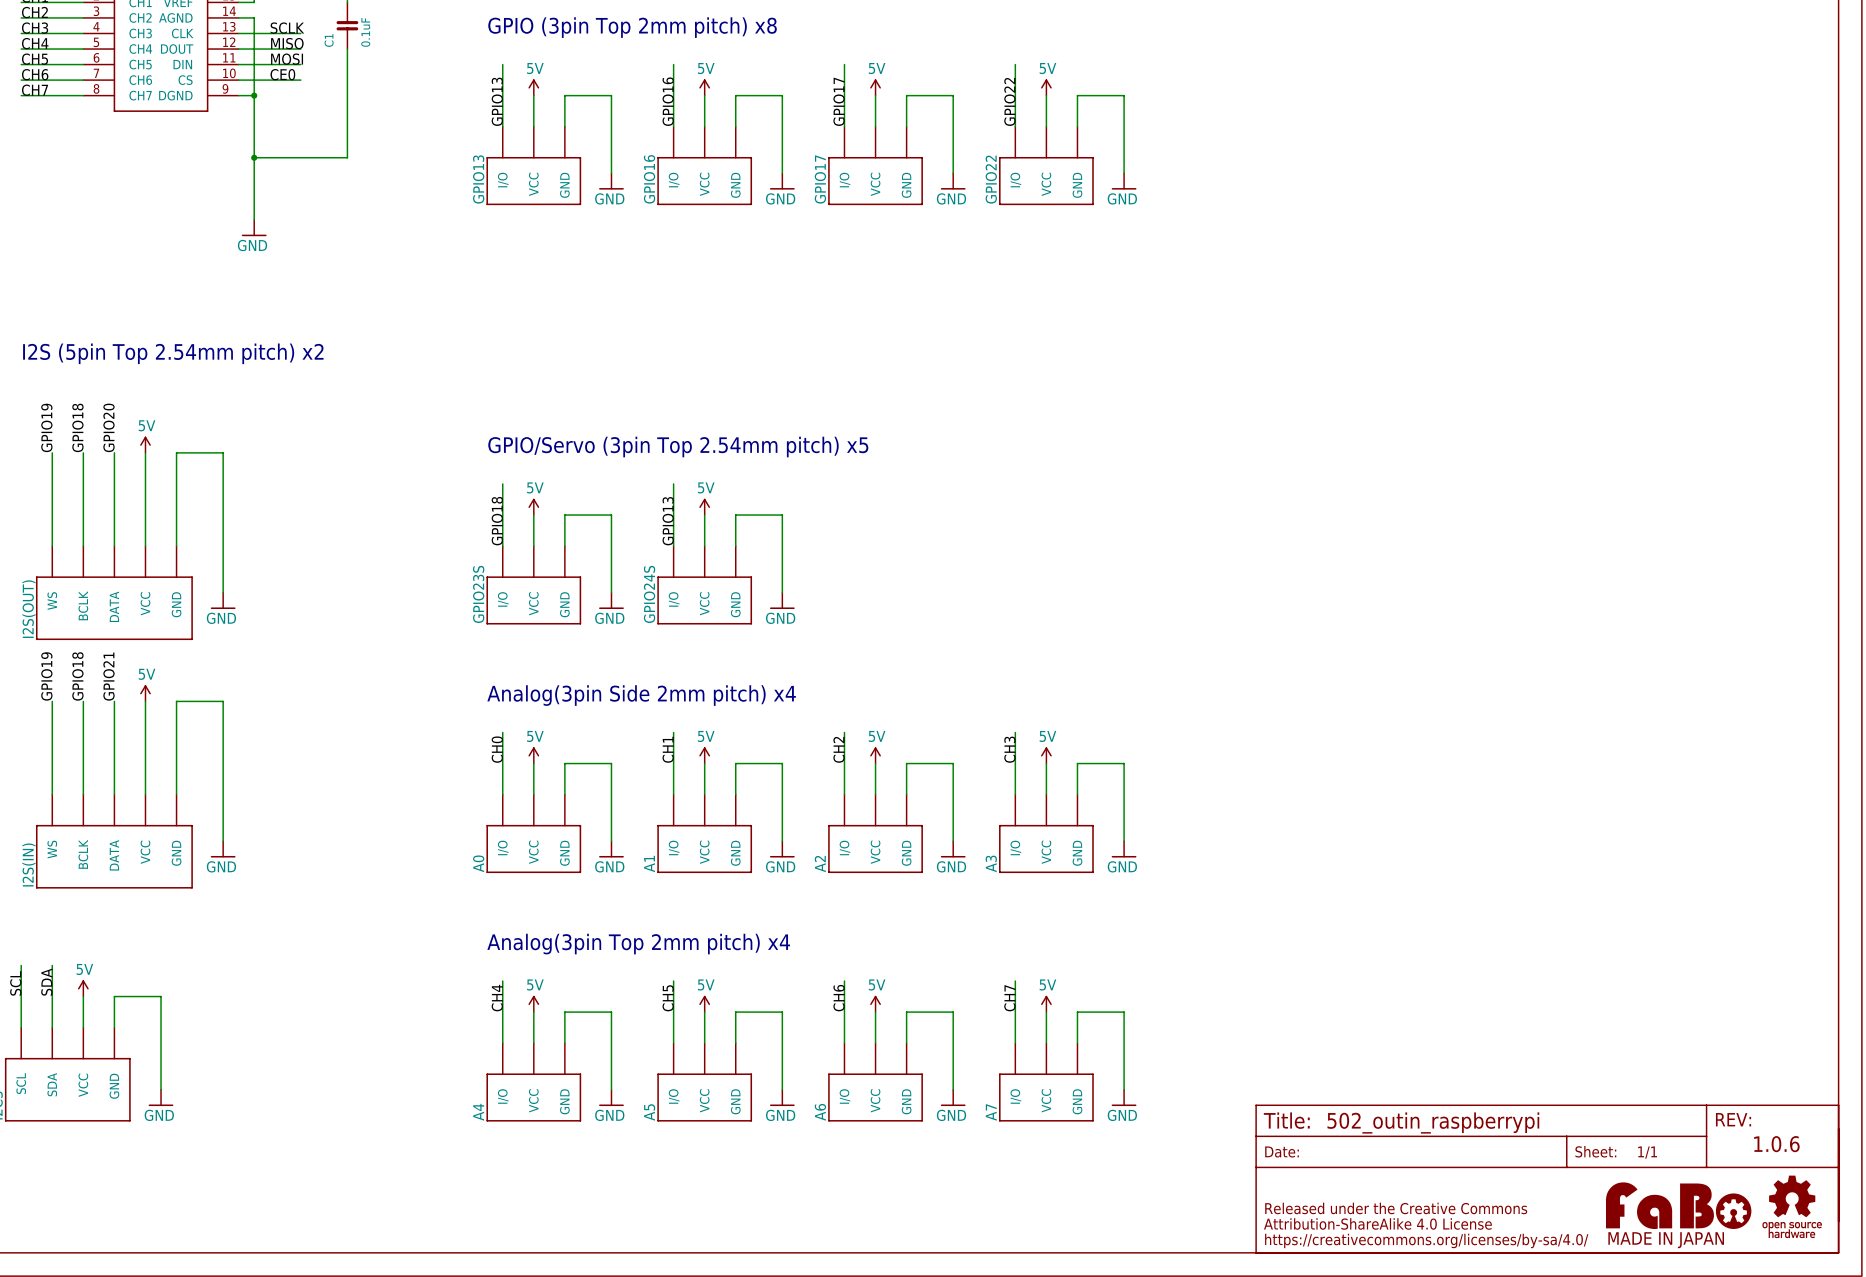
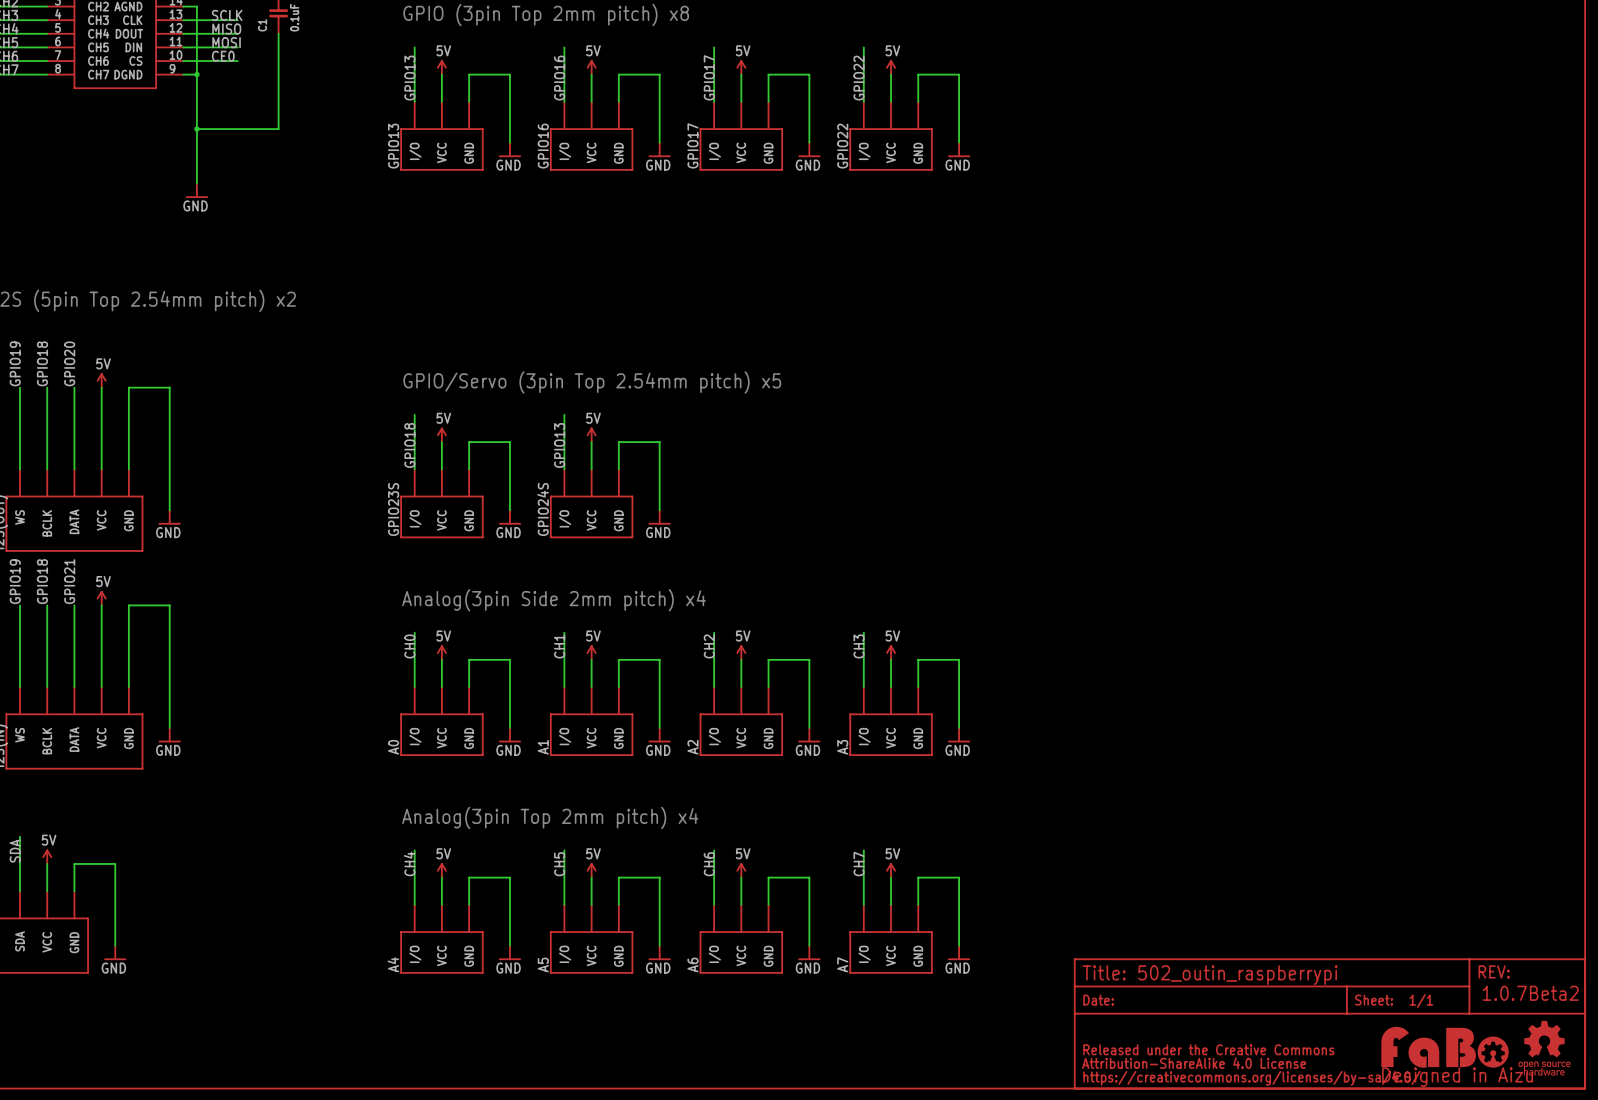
text: 1.0.6 (1776, 1144) -> 1.0.7Beta2 (1530, 993)
part text: none -> Designed in Aizu (1457, 1077)
part text: MADE IN JAPAN (1666, 1240) -> none

